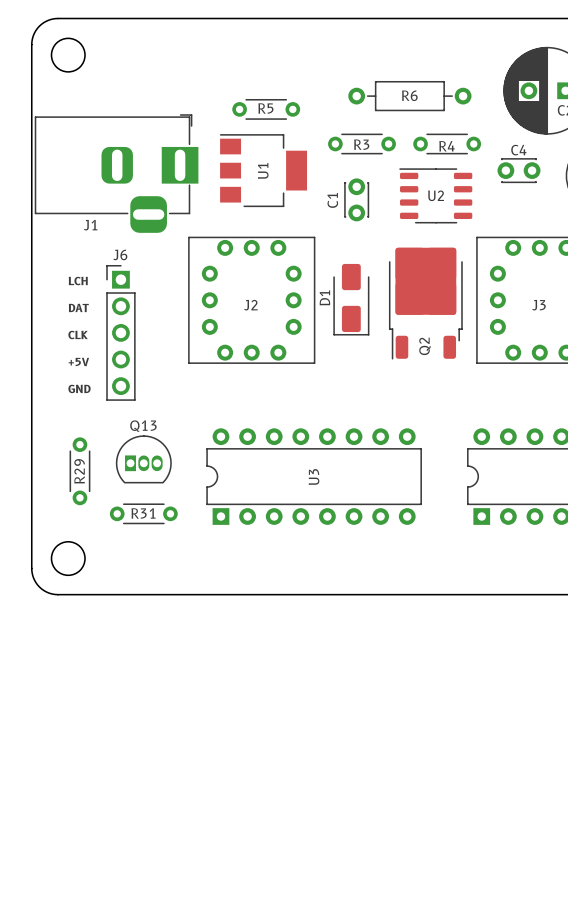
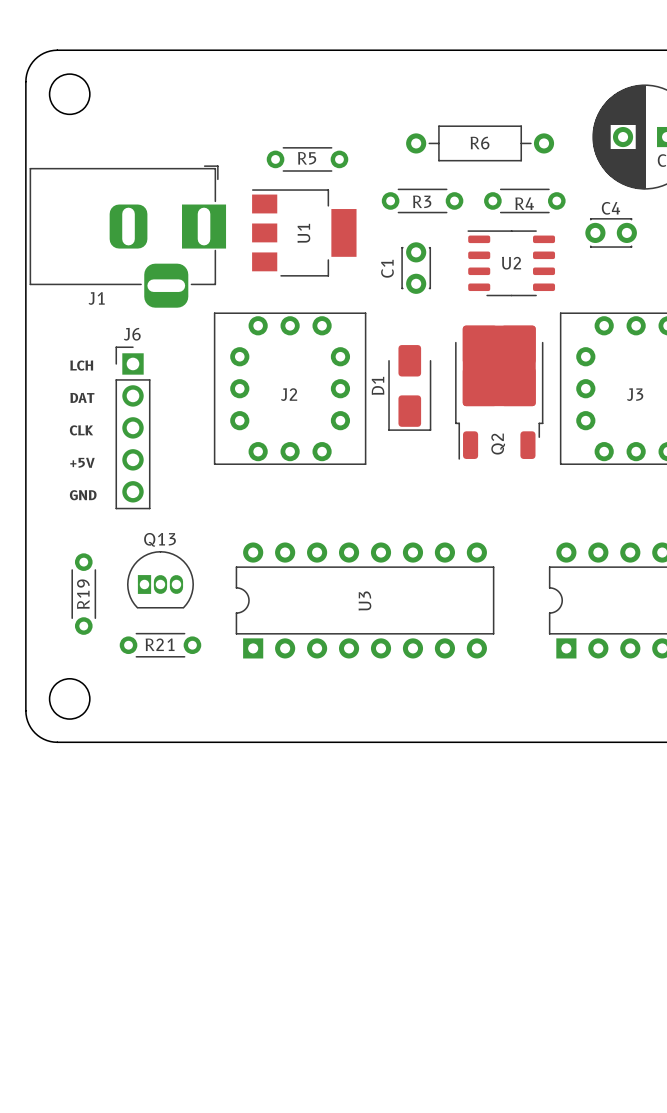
R29 name: R29 (79, 471) -> R19 (83, 594)
R31 name: R31 (143, 513) -> R21 (160, 644)

